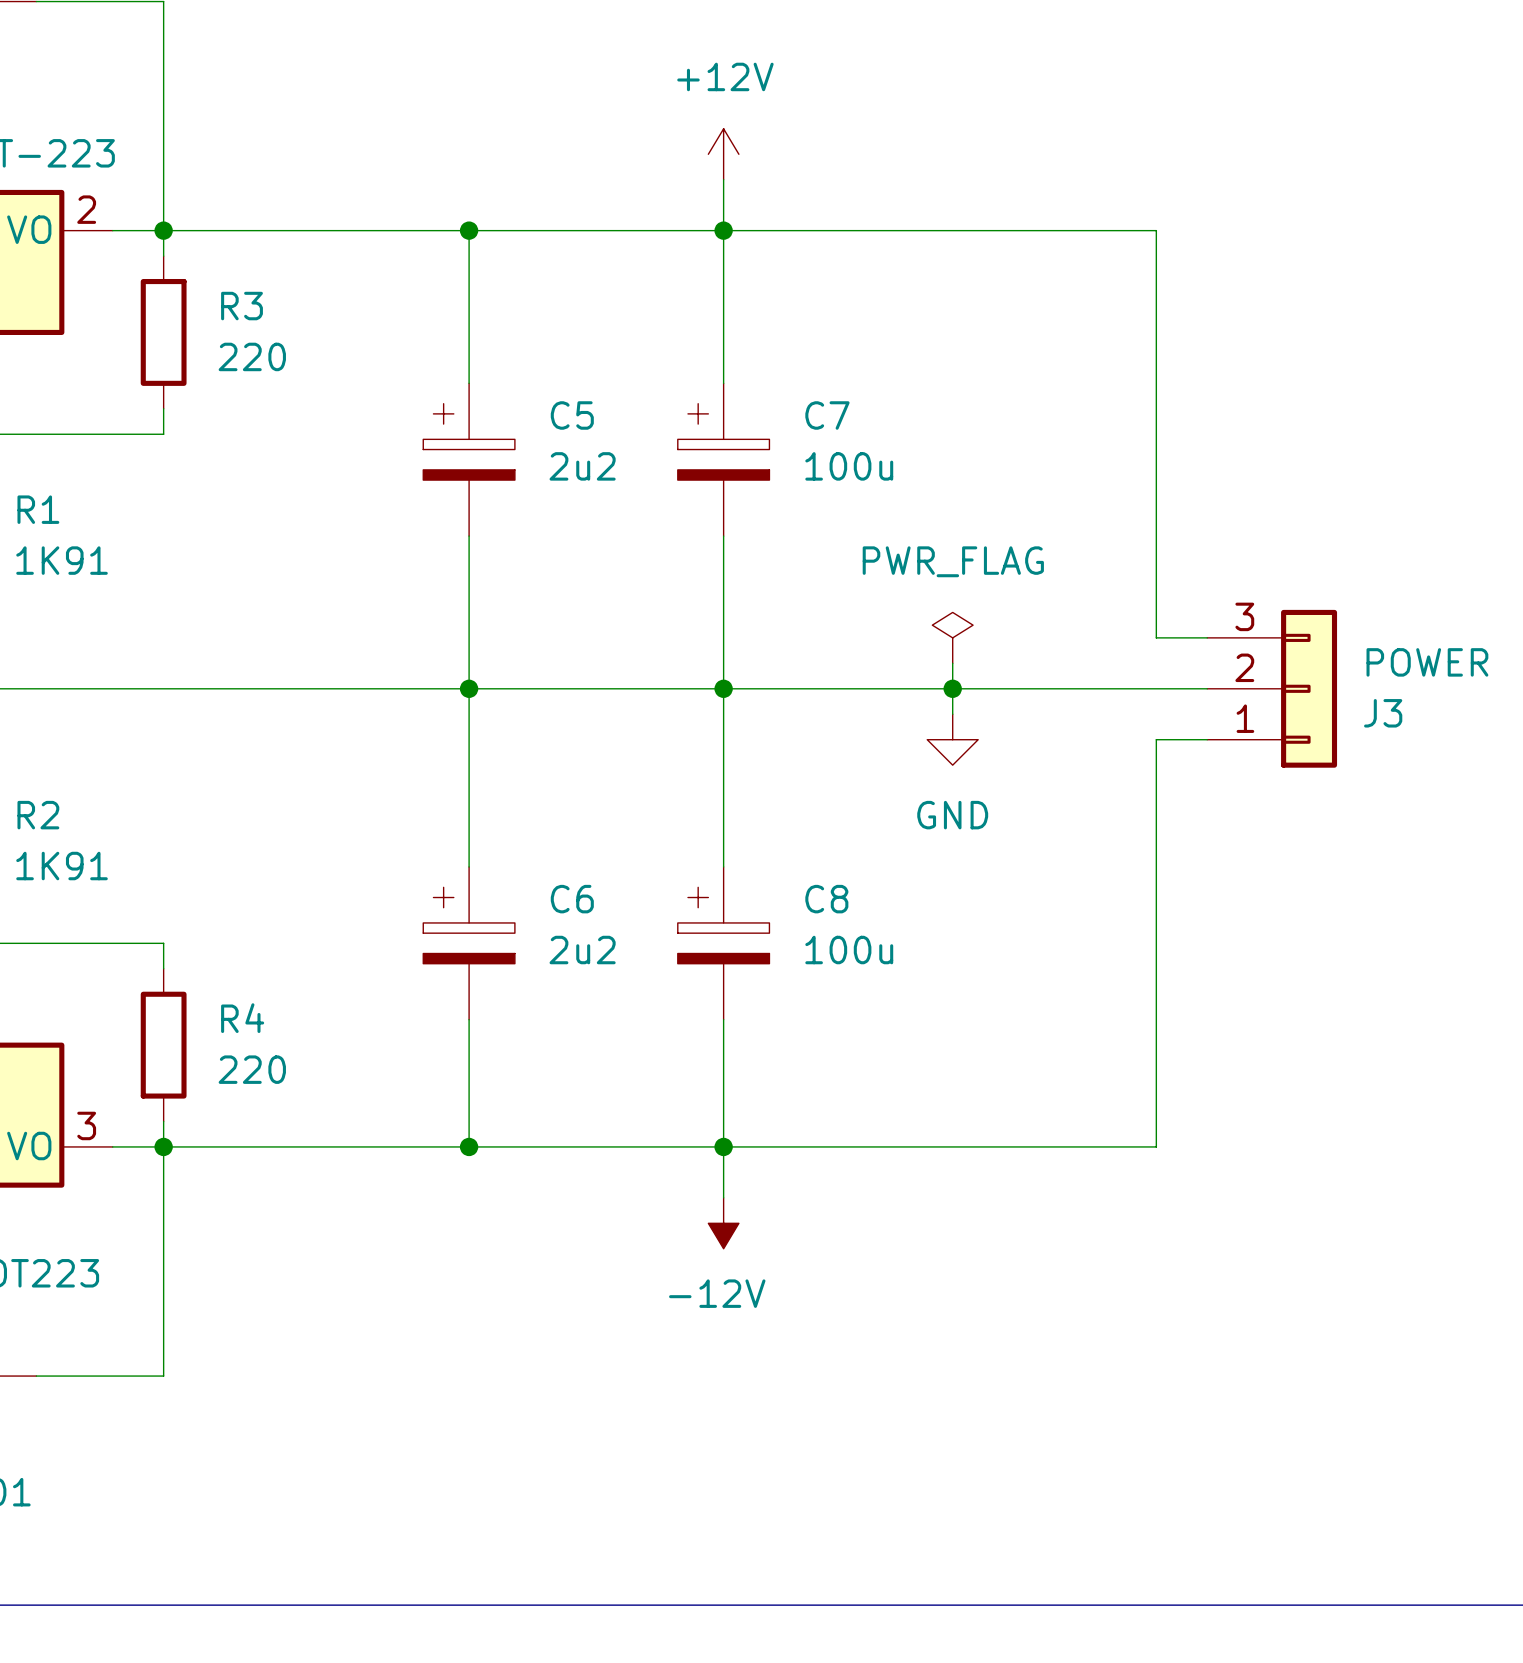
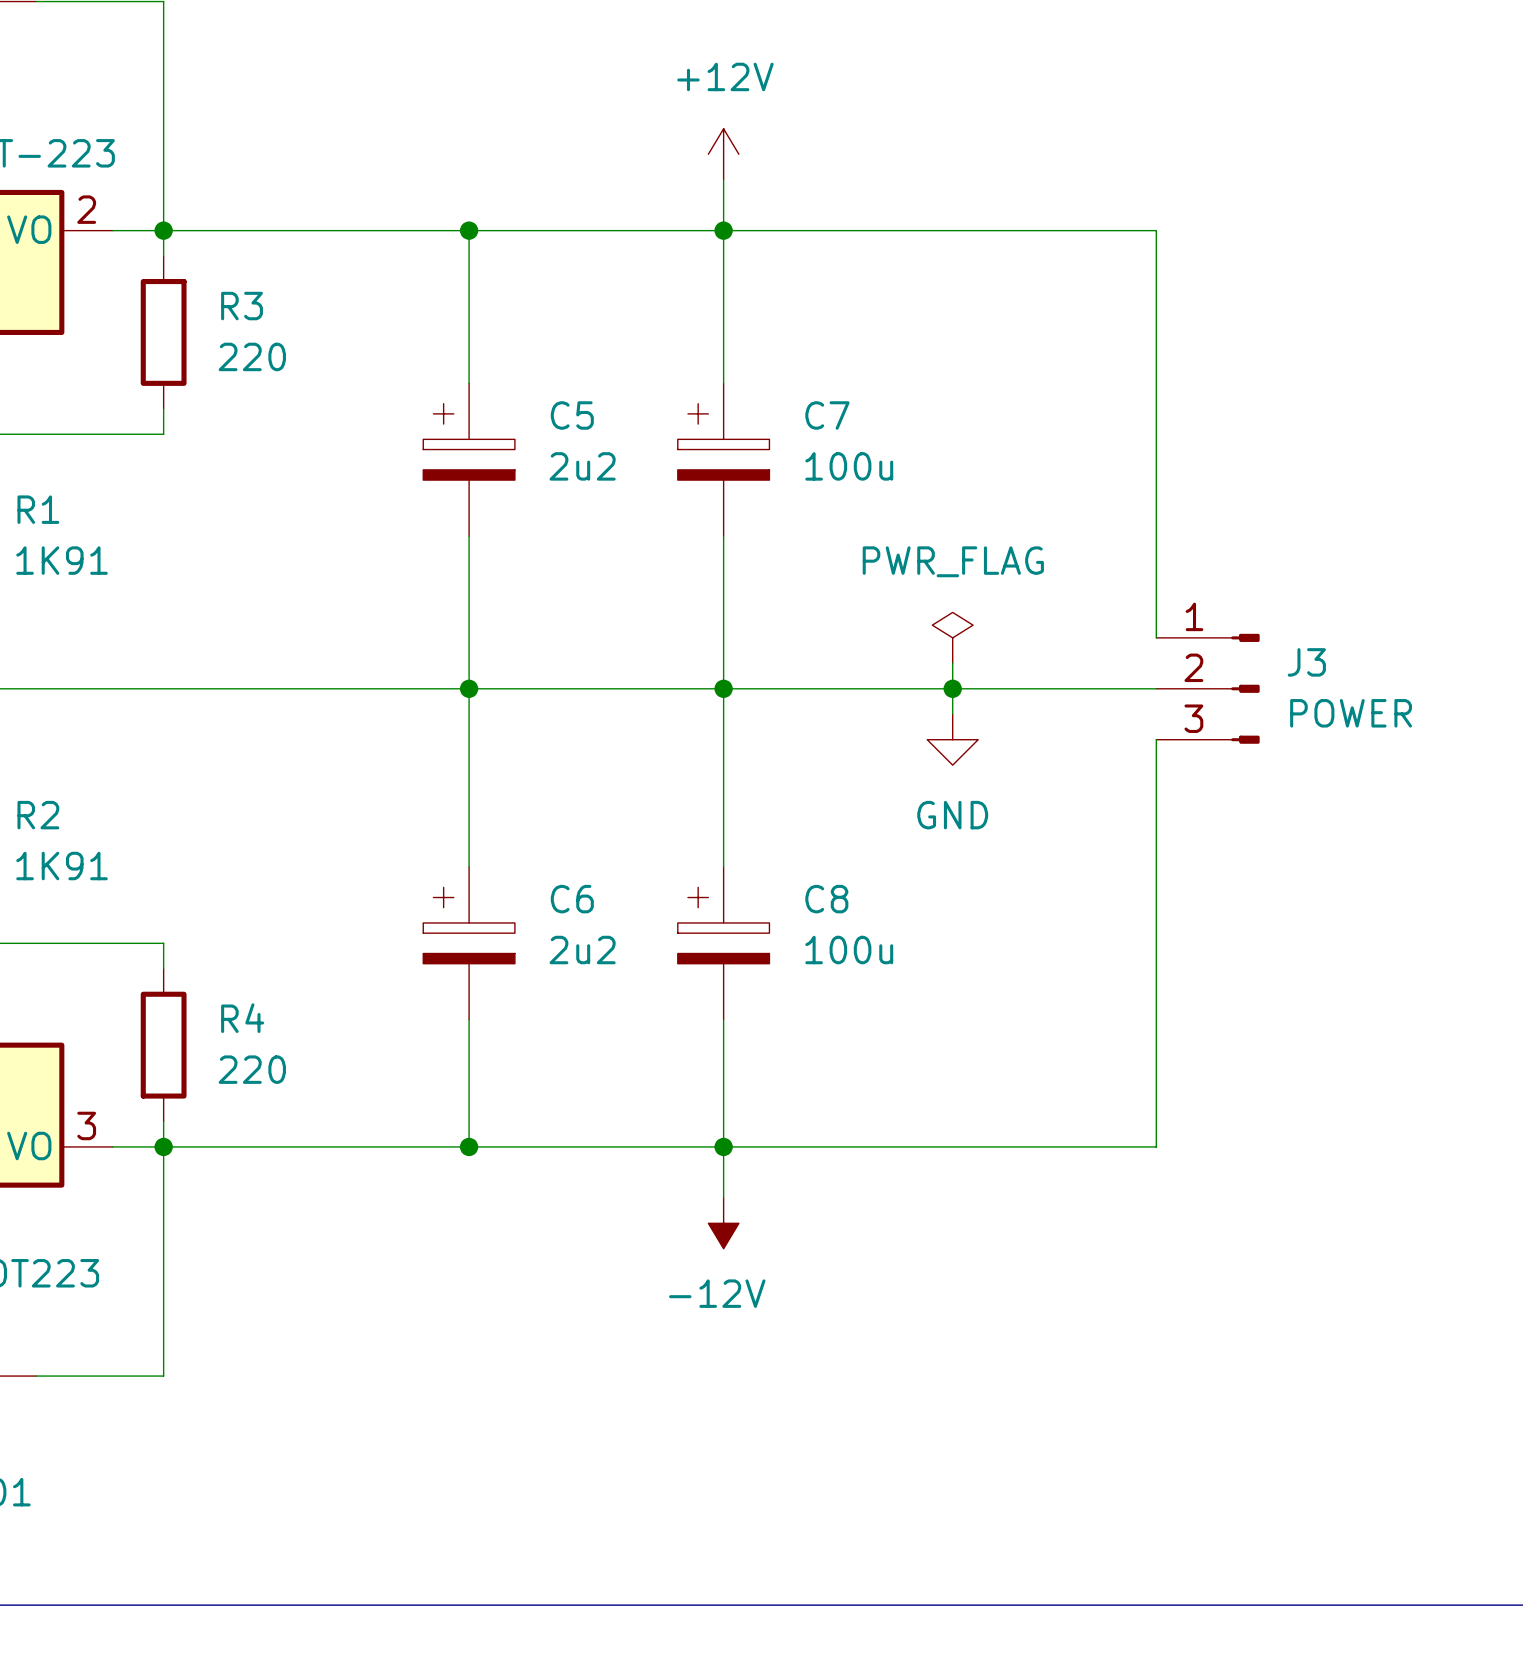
J3 symbol: [1207, 609, 1338, 768] -> [1156, 633, 1260, 744]
J3 value position: POWER (1427, 662) -> POWER (1351, 713)
J3 name position: J3 (1383, 713) -> J3 (1306, 662)

